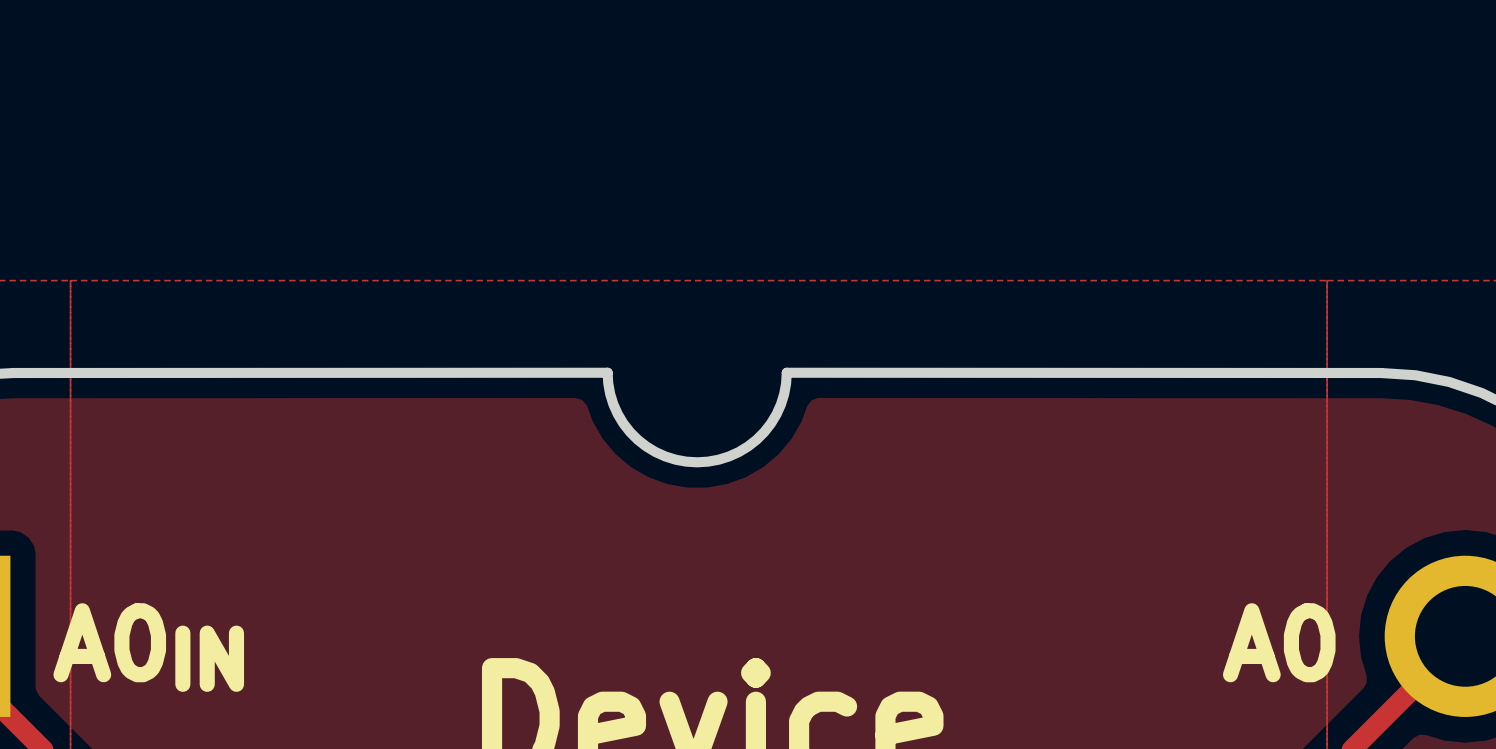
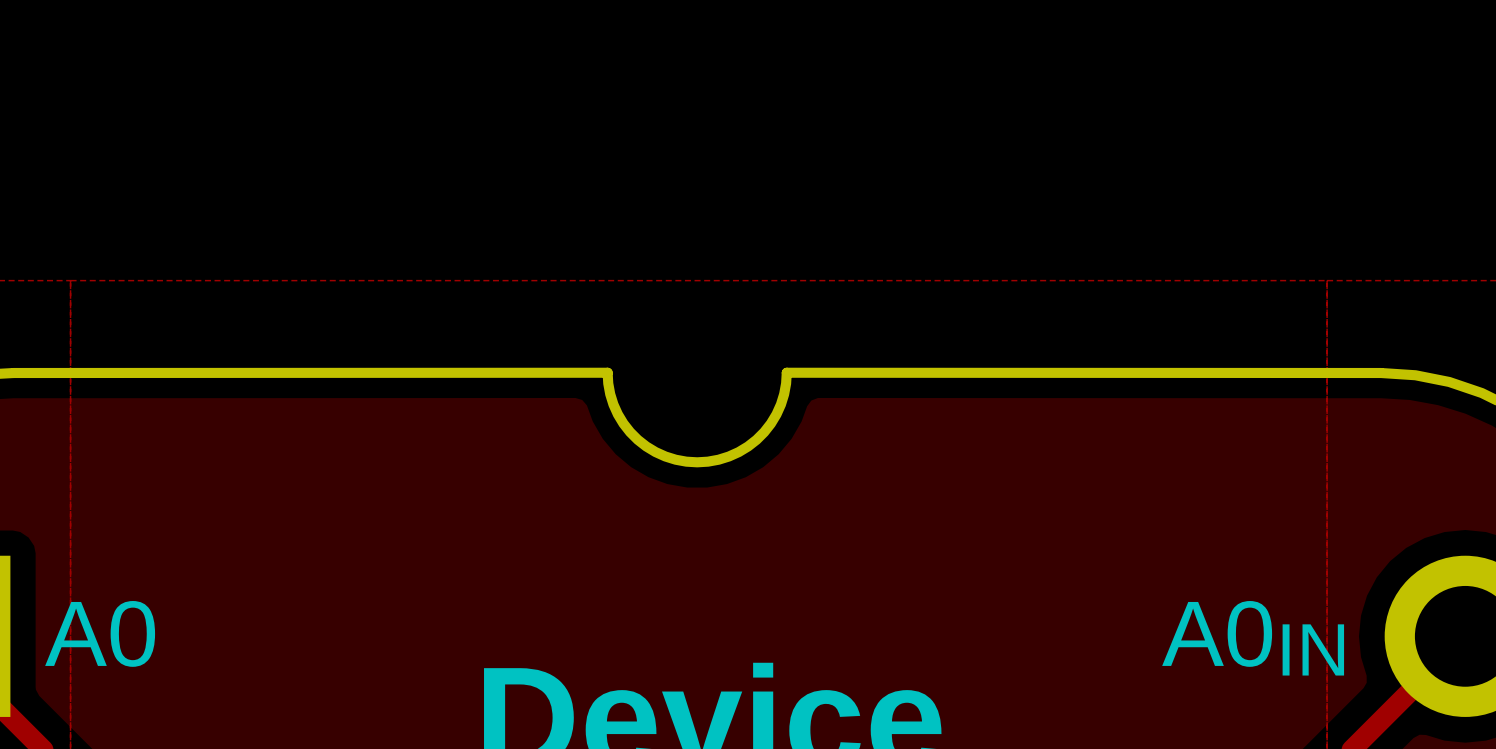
text: A0 (1279, 642) -> A0IN (1253, 638)
text: A0IN (148, 647) -> A0 (100, 633)

